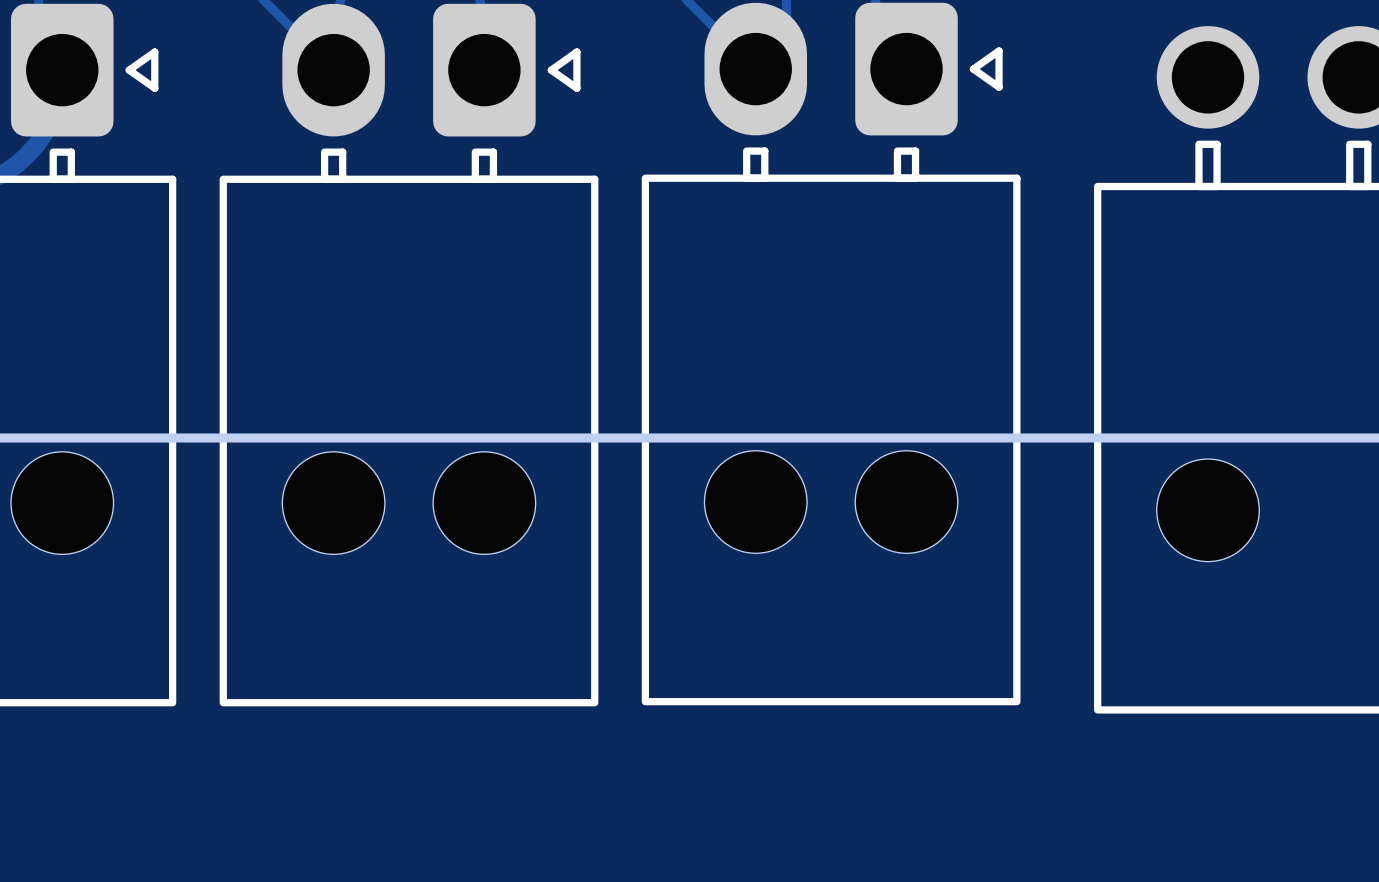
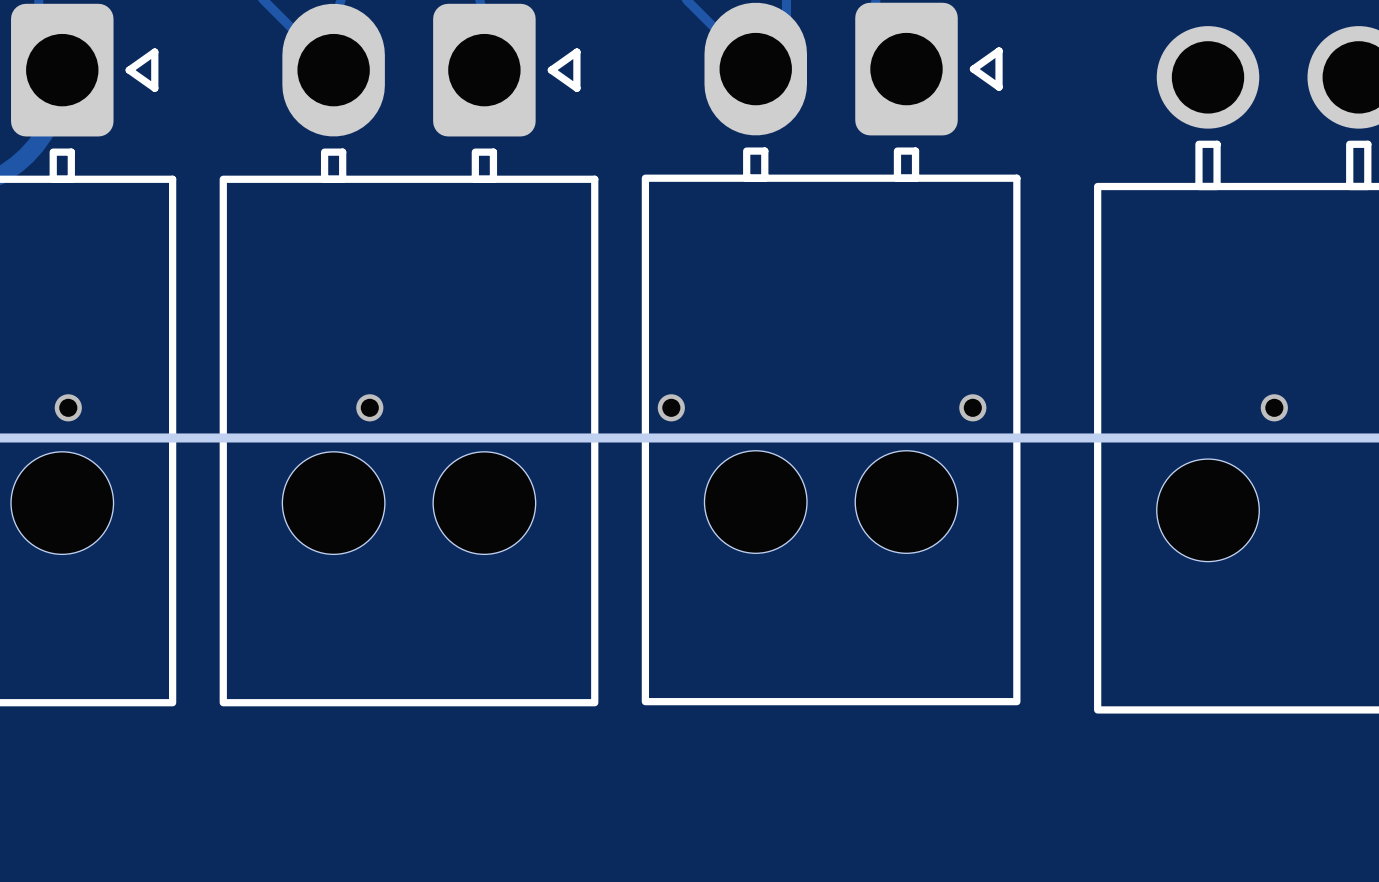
via: none -> (68, 407)
via: none -> (369, 407)
via: none -> (671, 407)
via: none -> (972, 407)
via: none -> (1274, 407)

